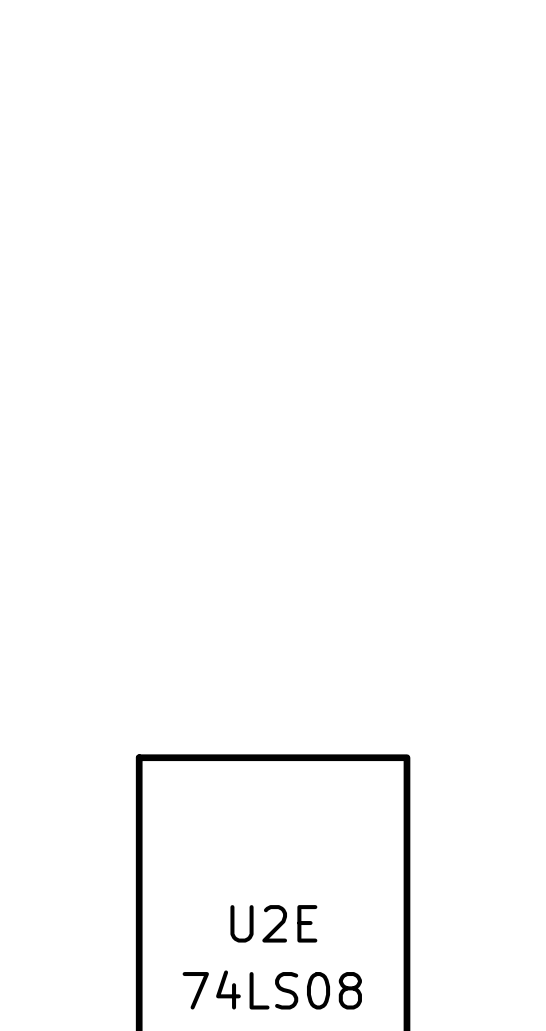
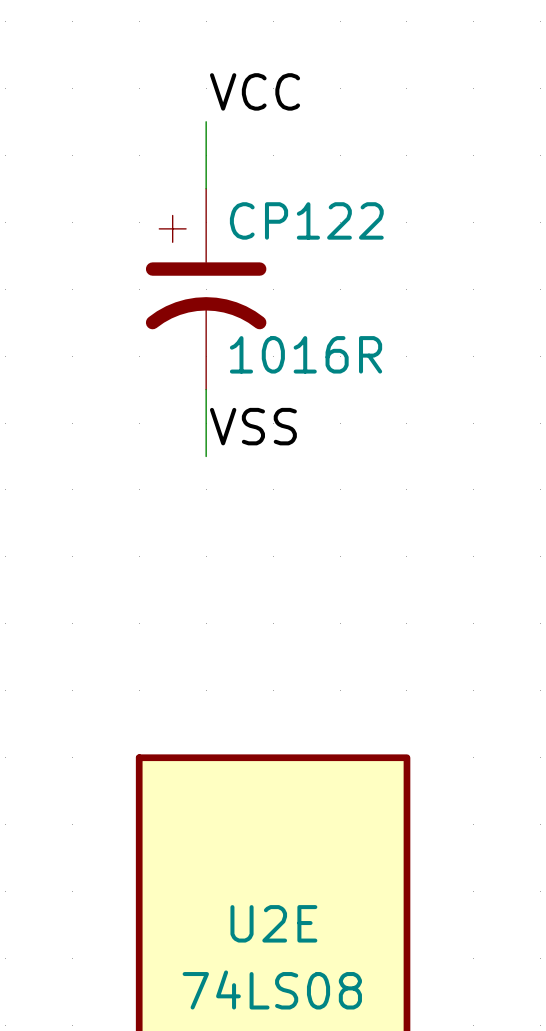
label: none -> VCC (255, 91)
wire: none -> (206, 121) (206, 188)
CP122: none -> 1016R (206, 289)
wire: none -> (206, 389) (206, 456)
label: none -> VSS (253, 426)

